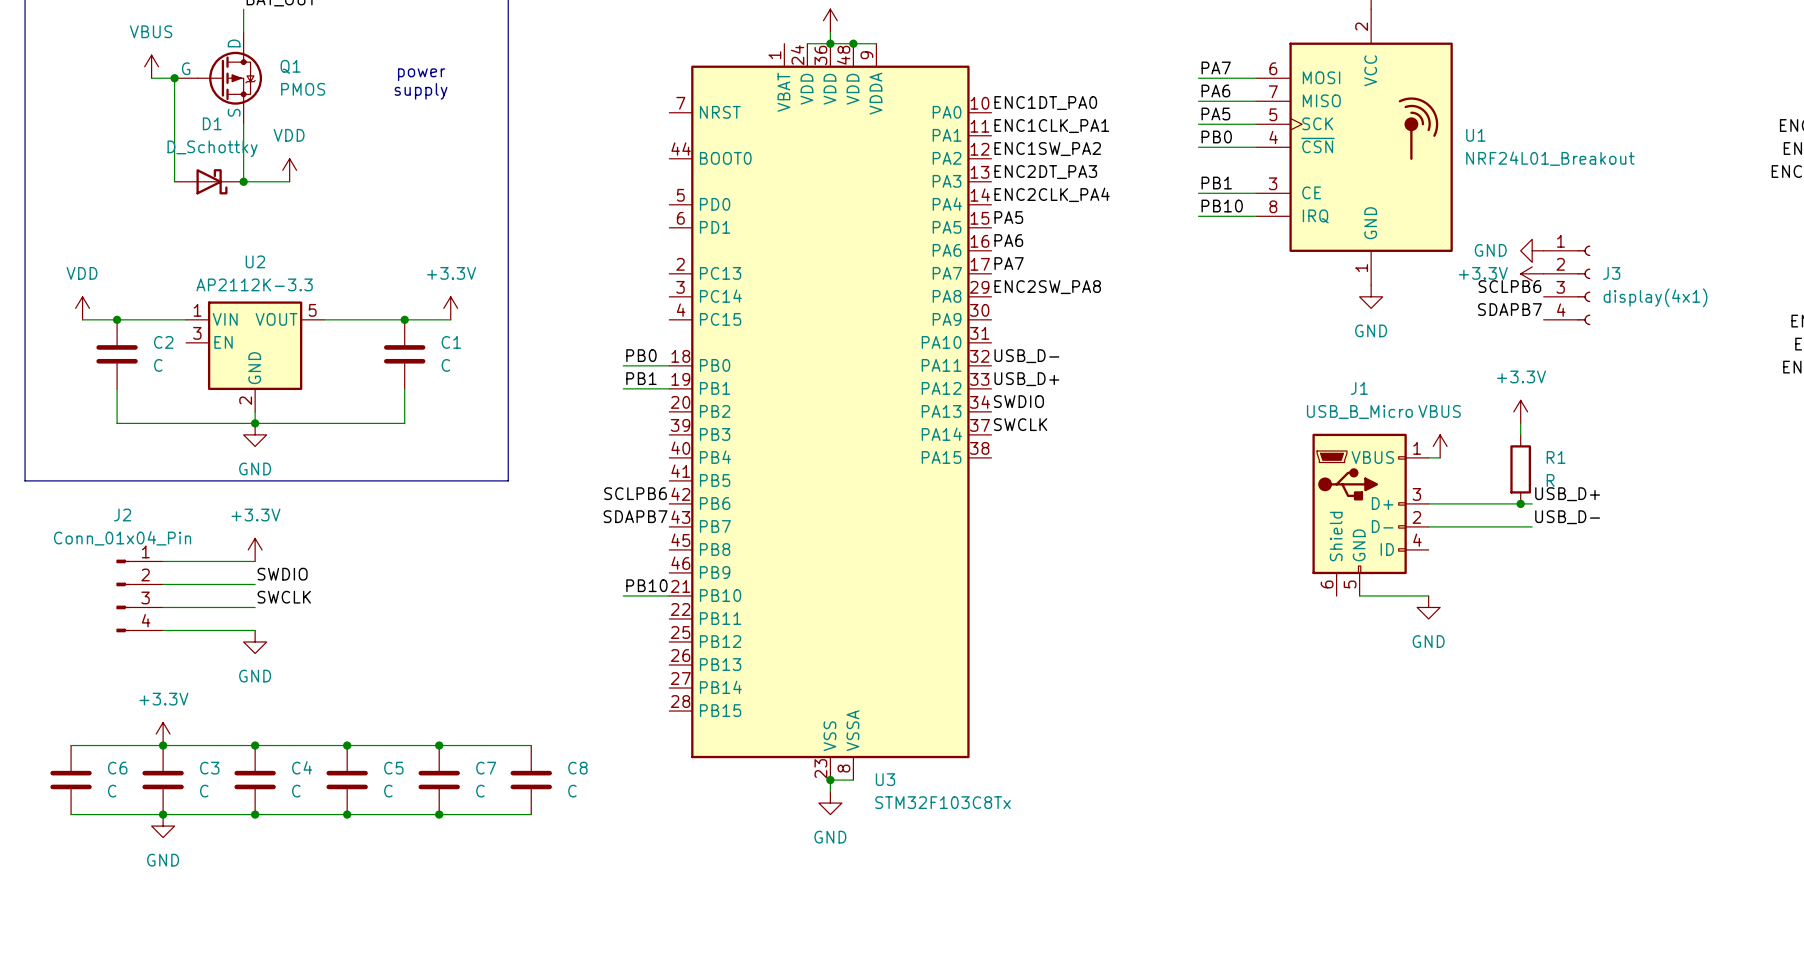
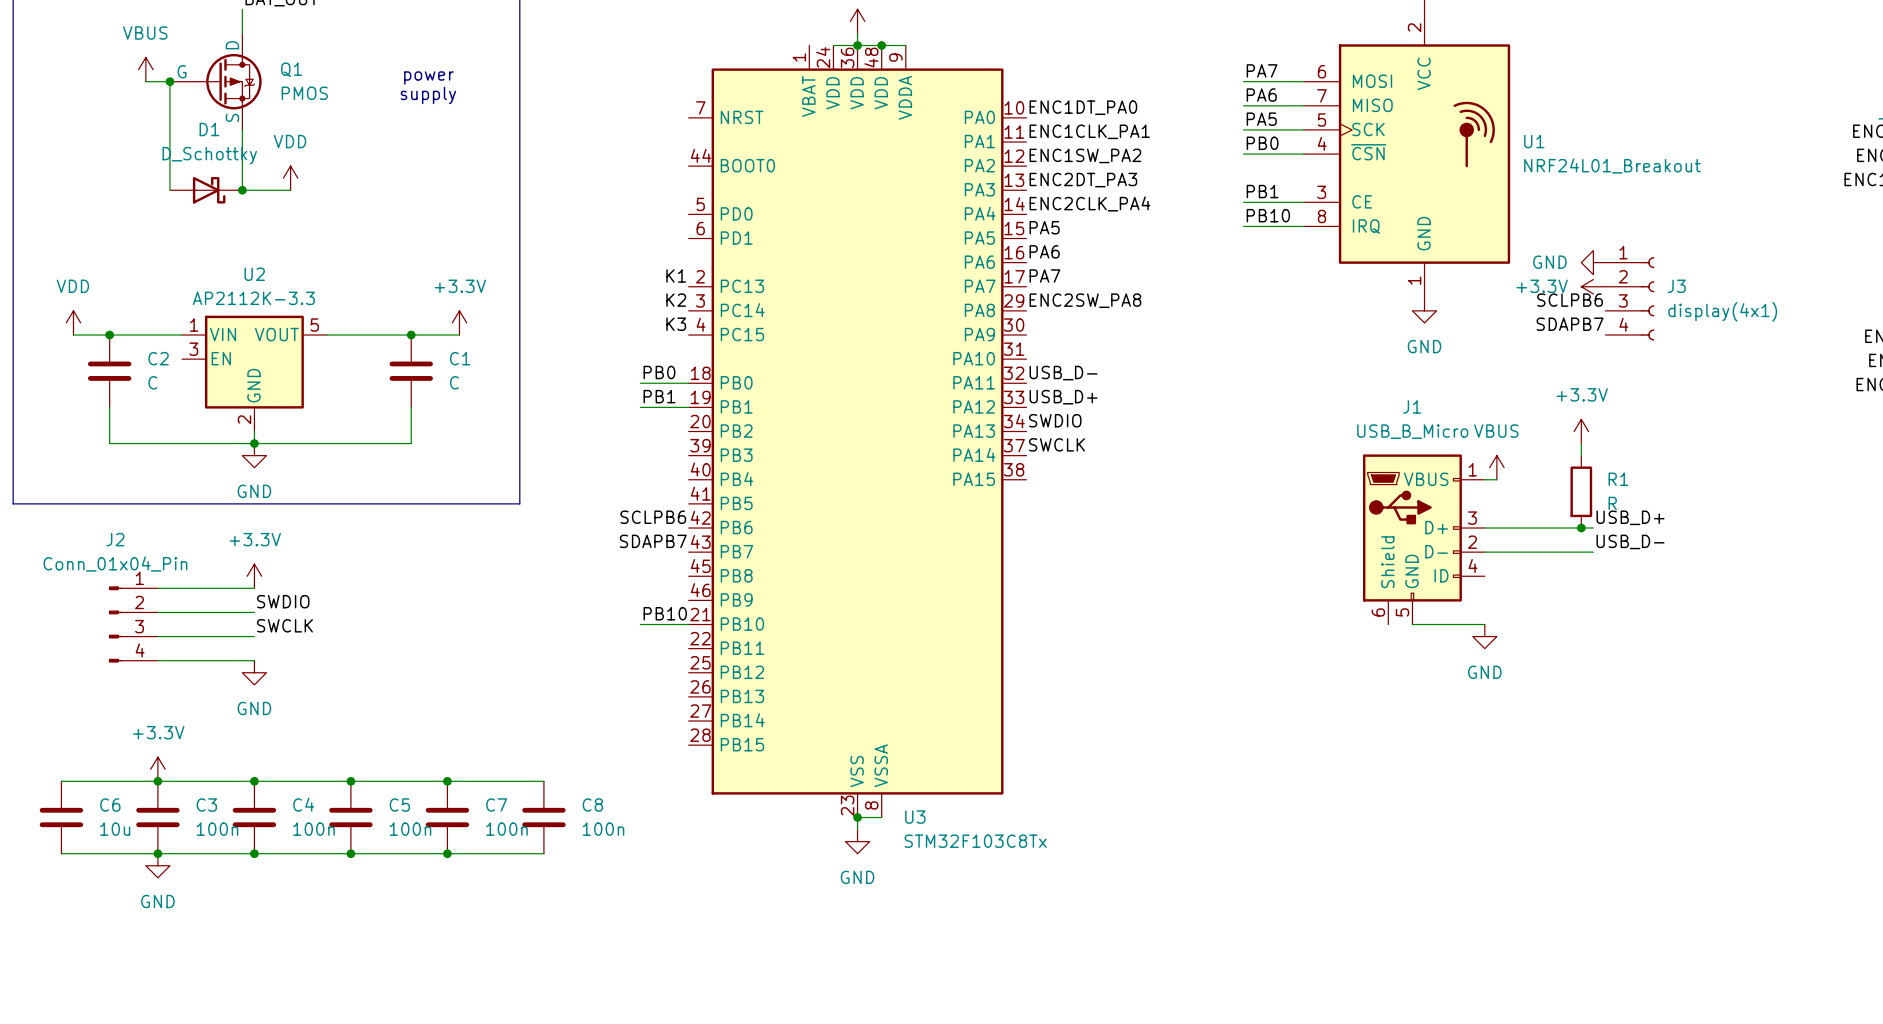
label: none -> K1 (676, 275)
label: none -> K2 (676, 300)
label: none -> K3 (676, 324)
C6 value: C (112, 791) -> 10u (115, 829)
C3 value: C (204, 791) -> 100n (217, 829)
C4 value: C (296, 791) -> 100n (313, 829)
C5 value: C (388, 791) -> 100n (410, 829)
C7 value: C (480, 791) -> 100n (506, 829)
C8 value: C (572, 791) -> 100n (603, 829)

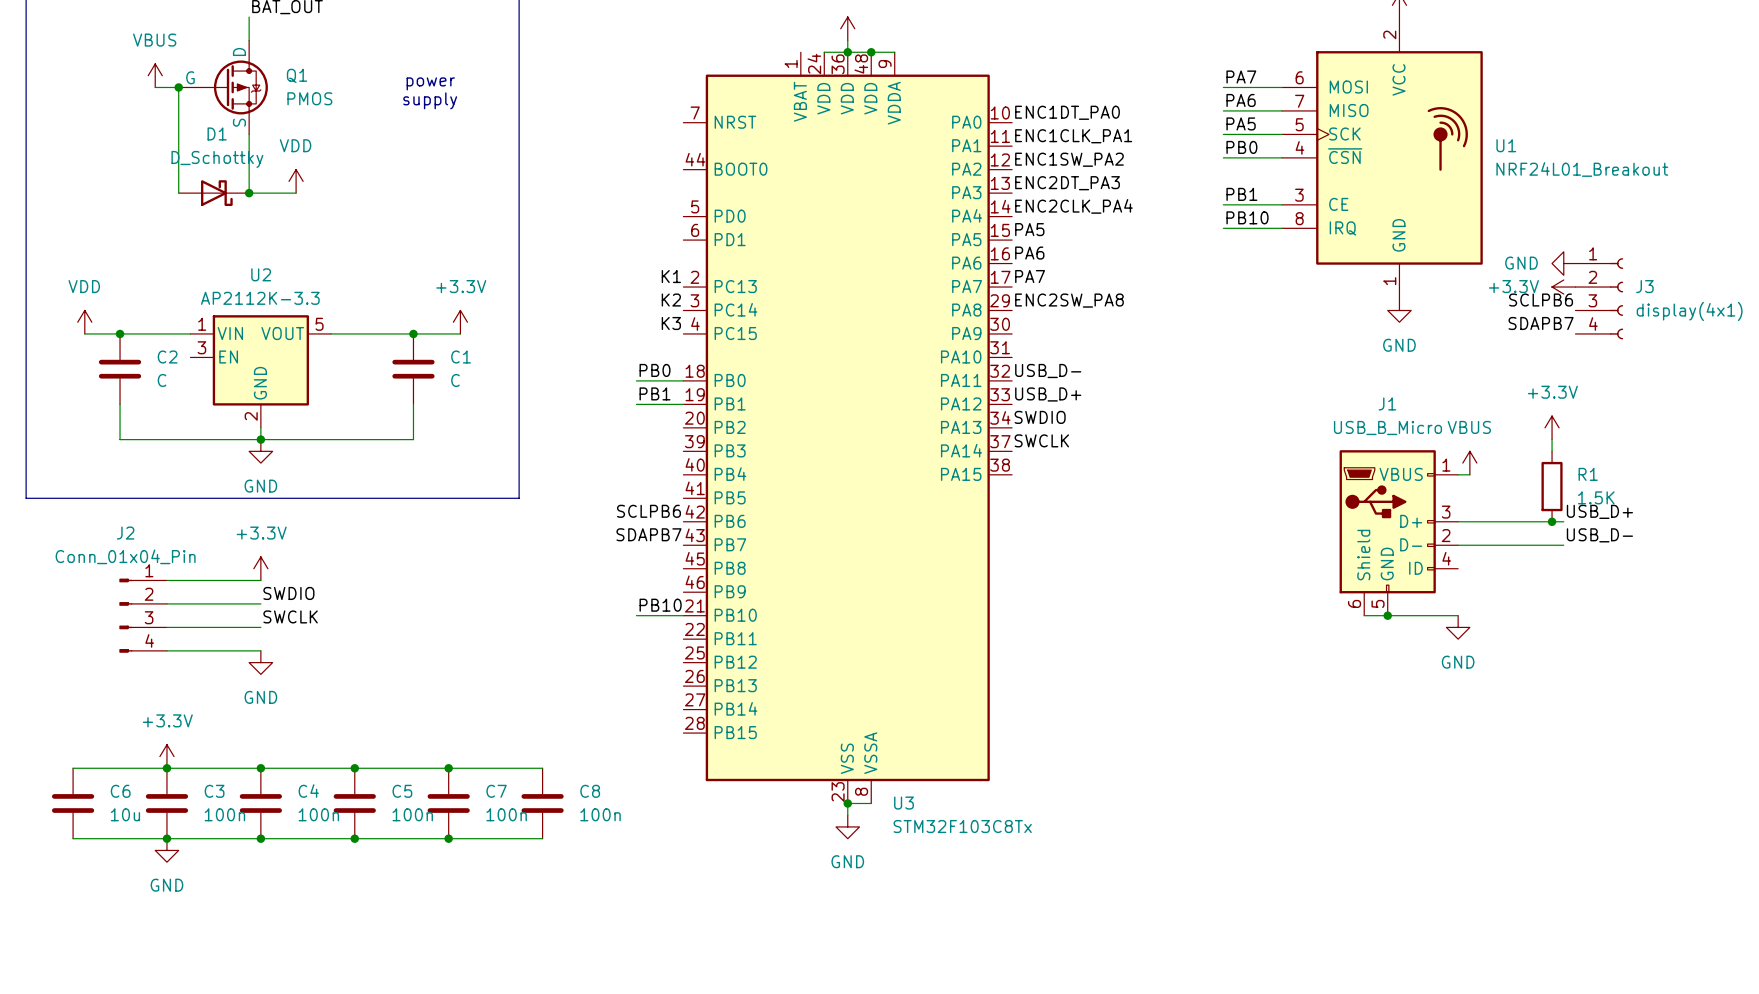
R1 value: R (1612, 503) -> 1.5K (1596, 497)
wire: none -> (1364, 615) (1387, 615)
junction: none -> (1387, 615)

